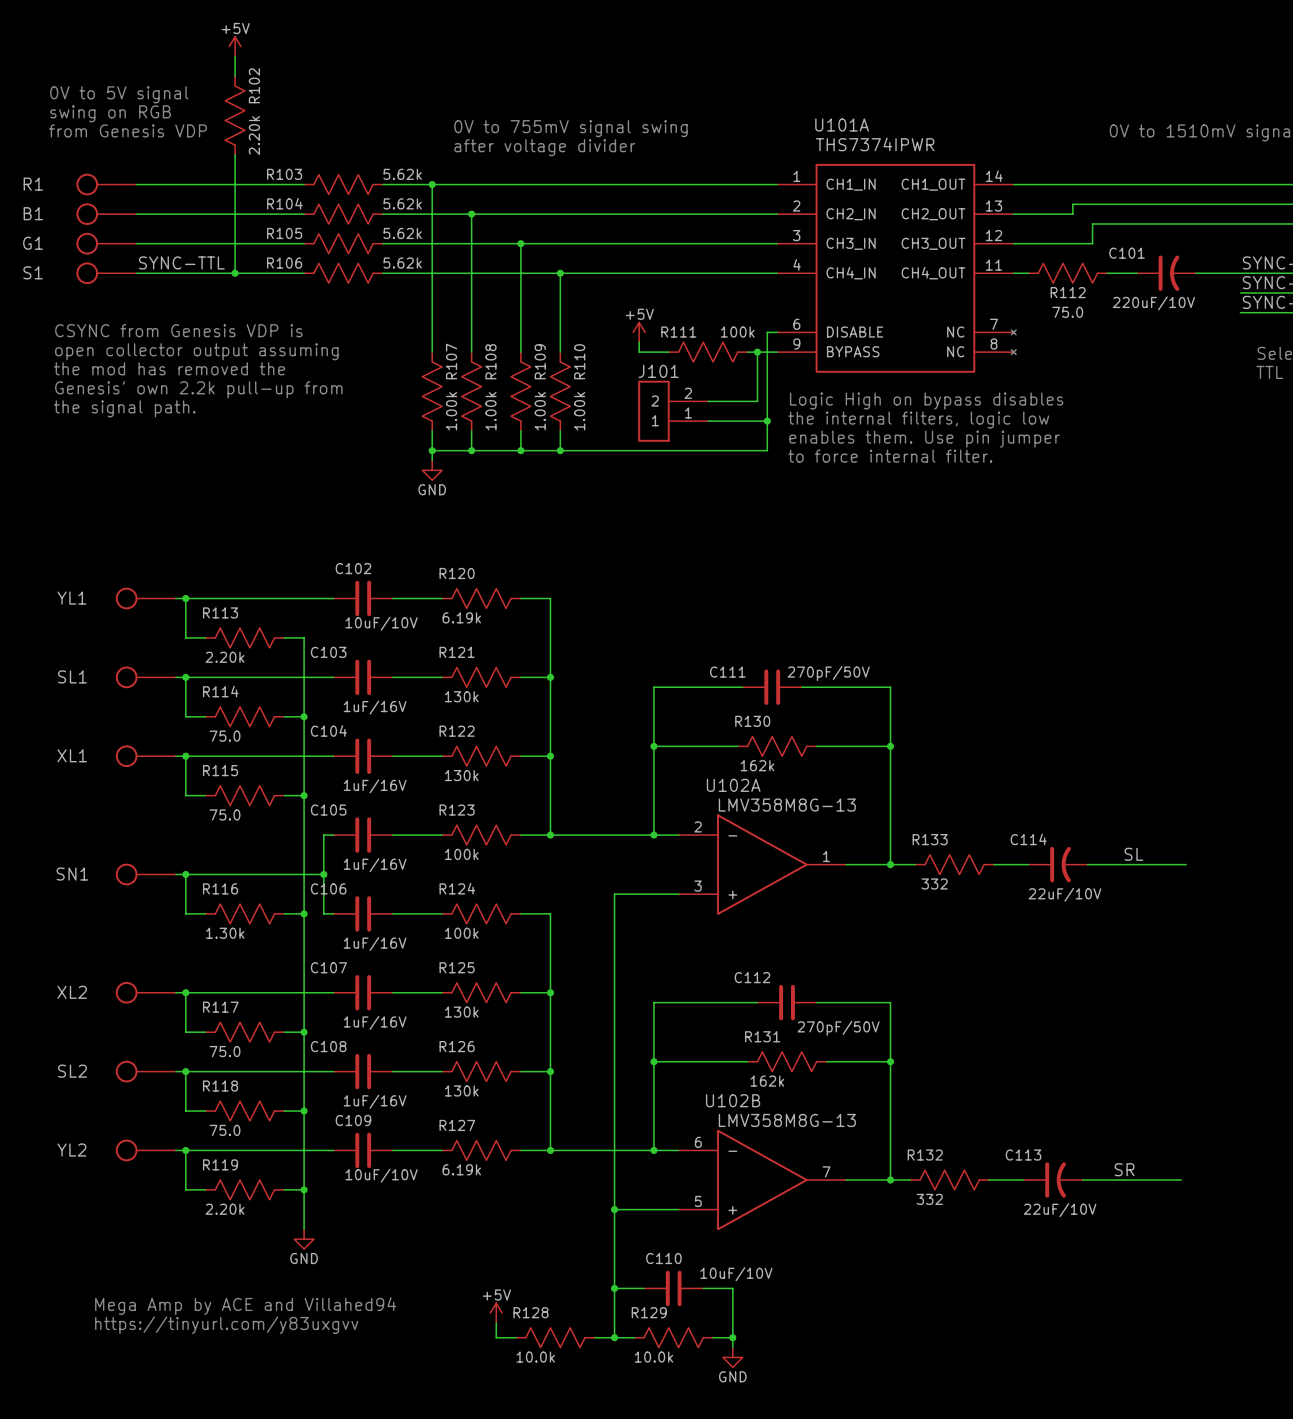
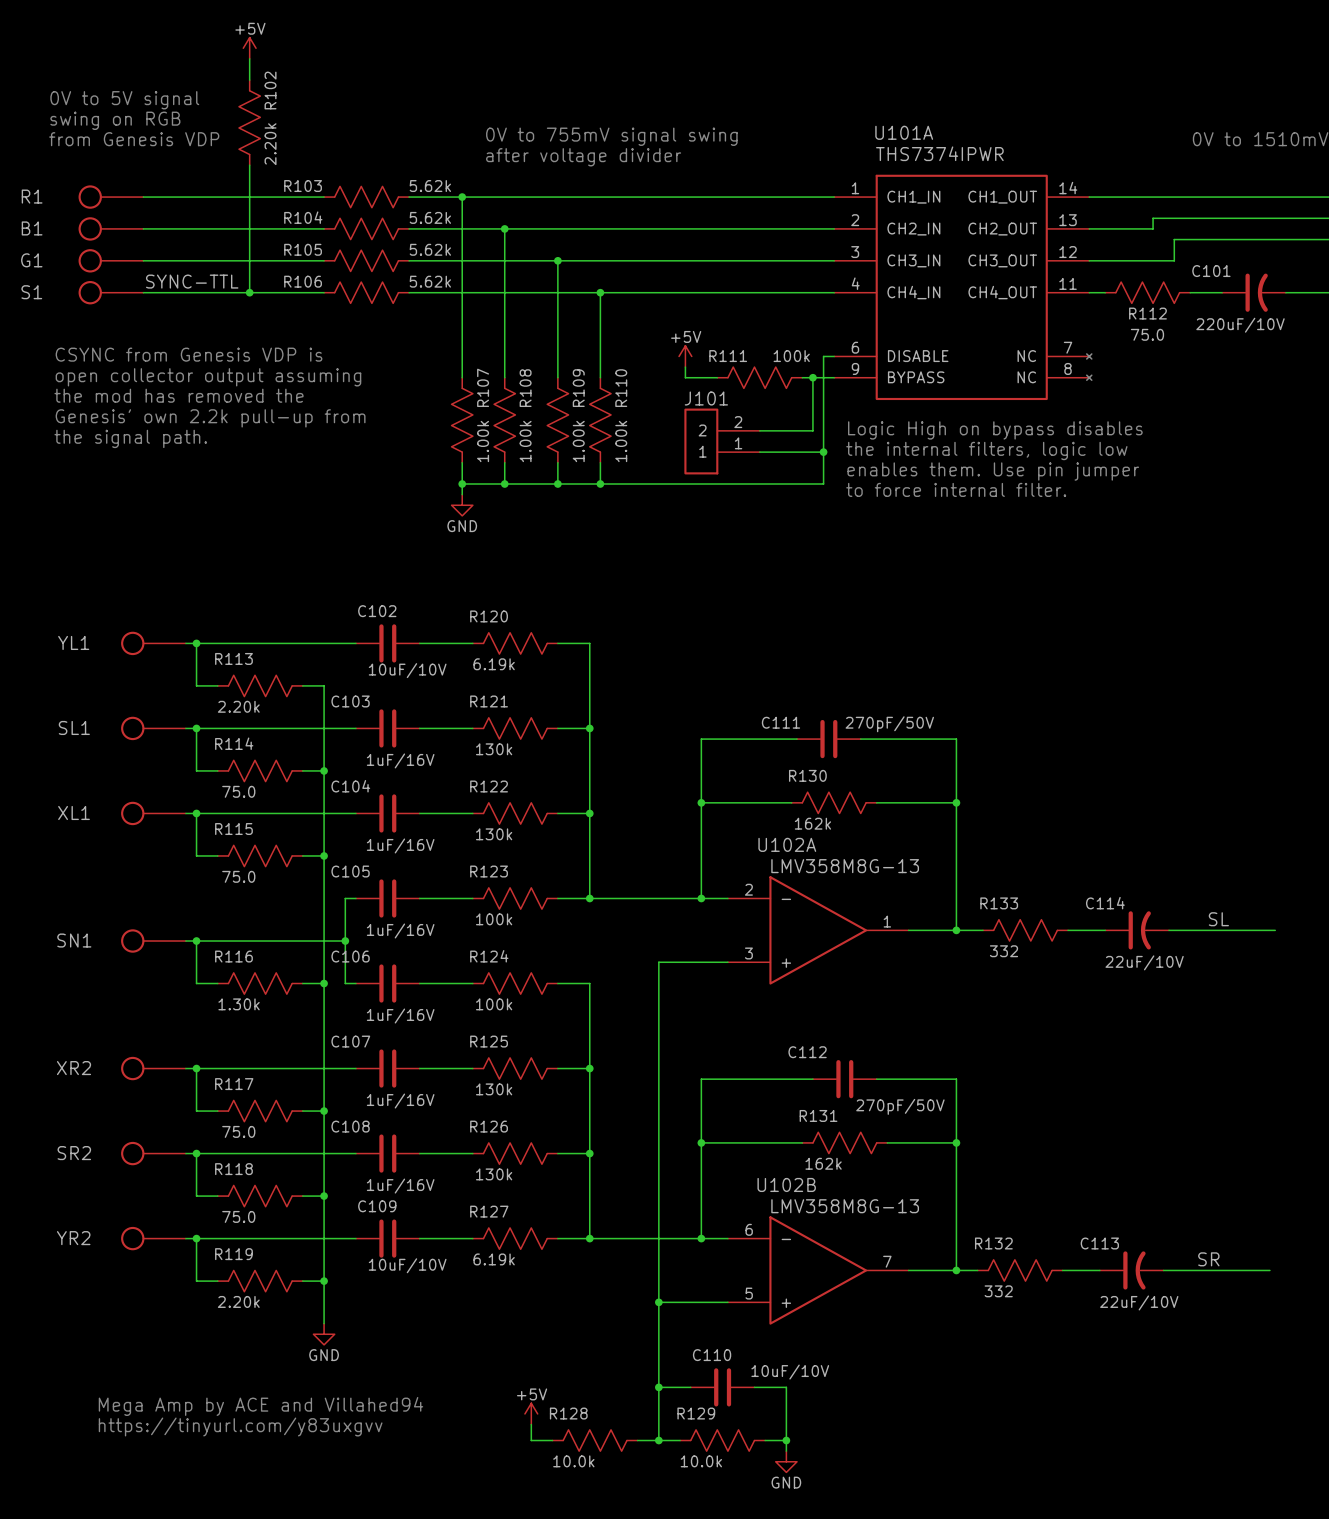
XL2 name: XL2 (72, 992) -> XR2 (74, 1068)
SL2 name: SL2 (72, 1071) -> SR2 (74, 1153)
YL2 name: YL2 (71, 1150) -> YR2 (73, 1238)

